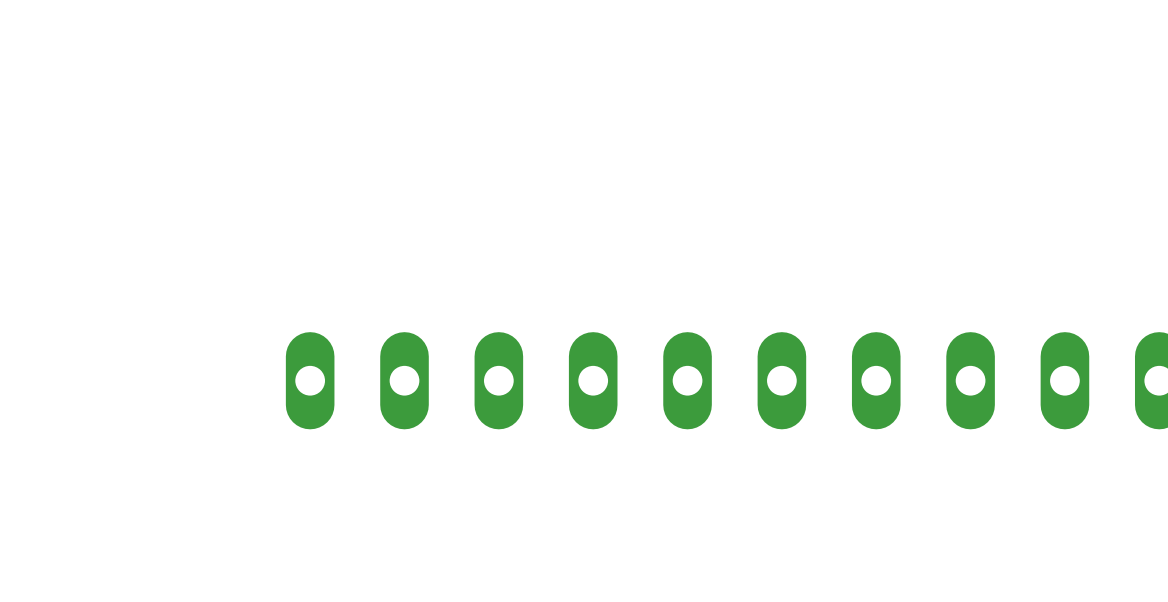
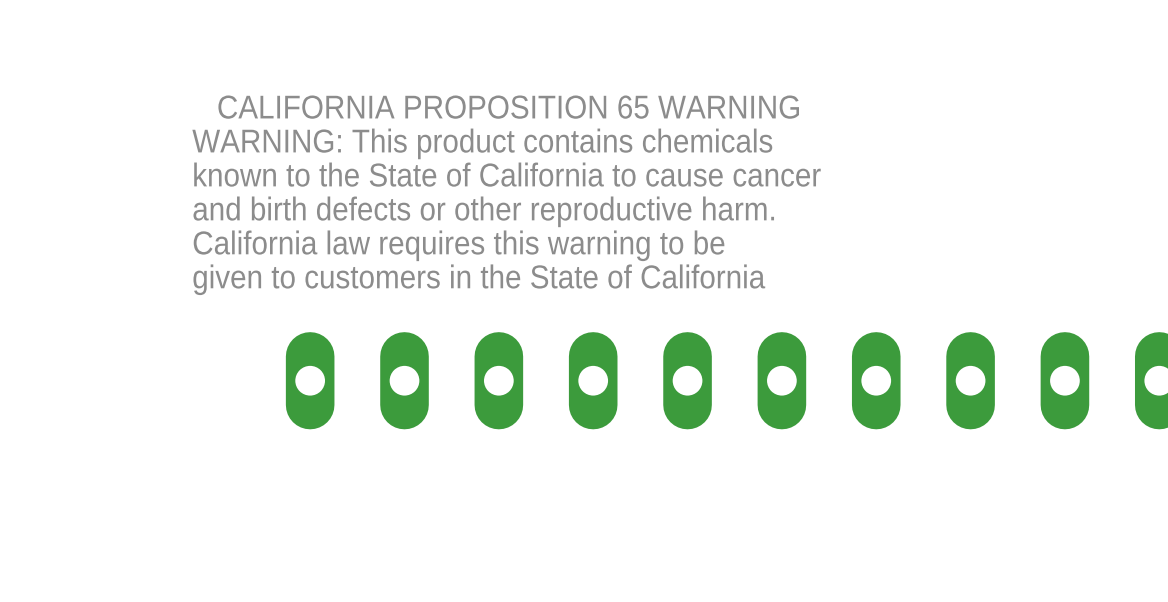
drawing: none -> [192, 95, 821, 296]

